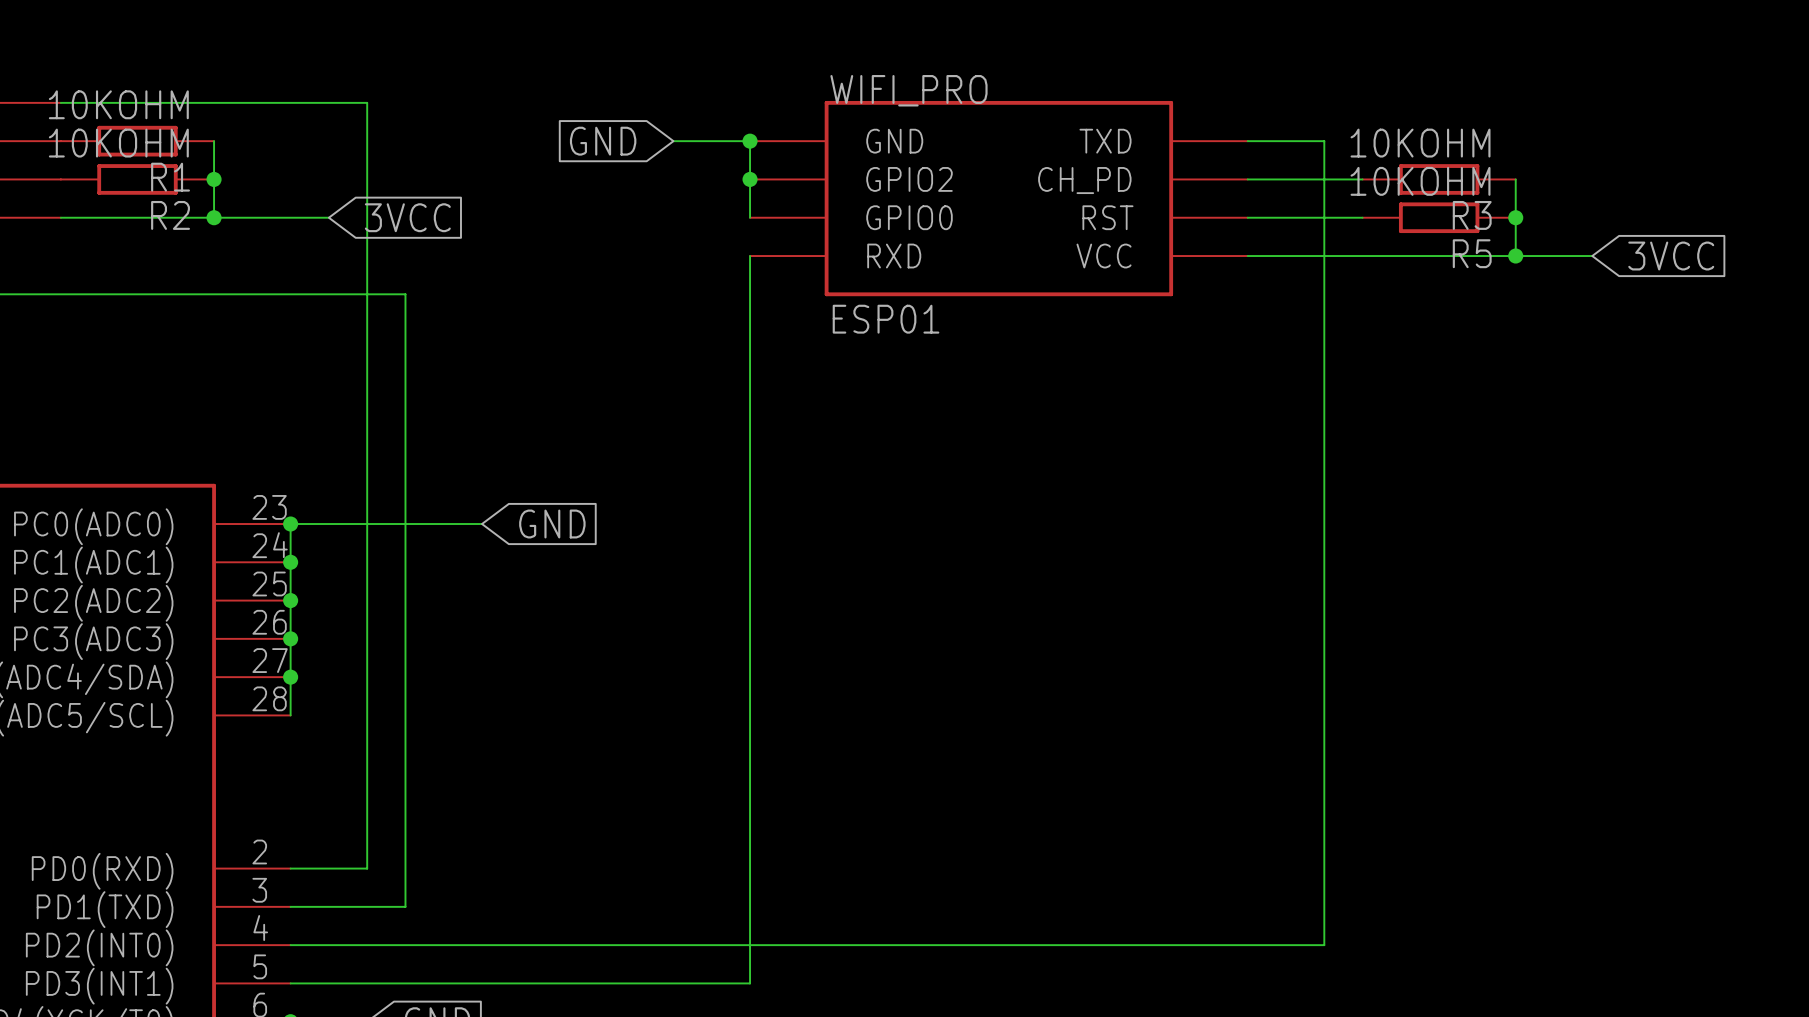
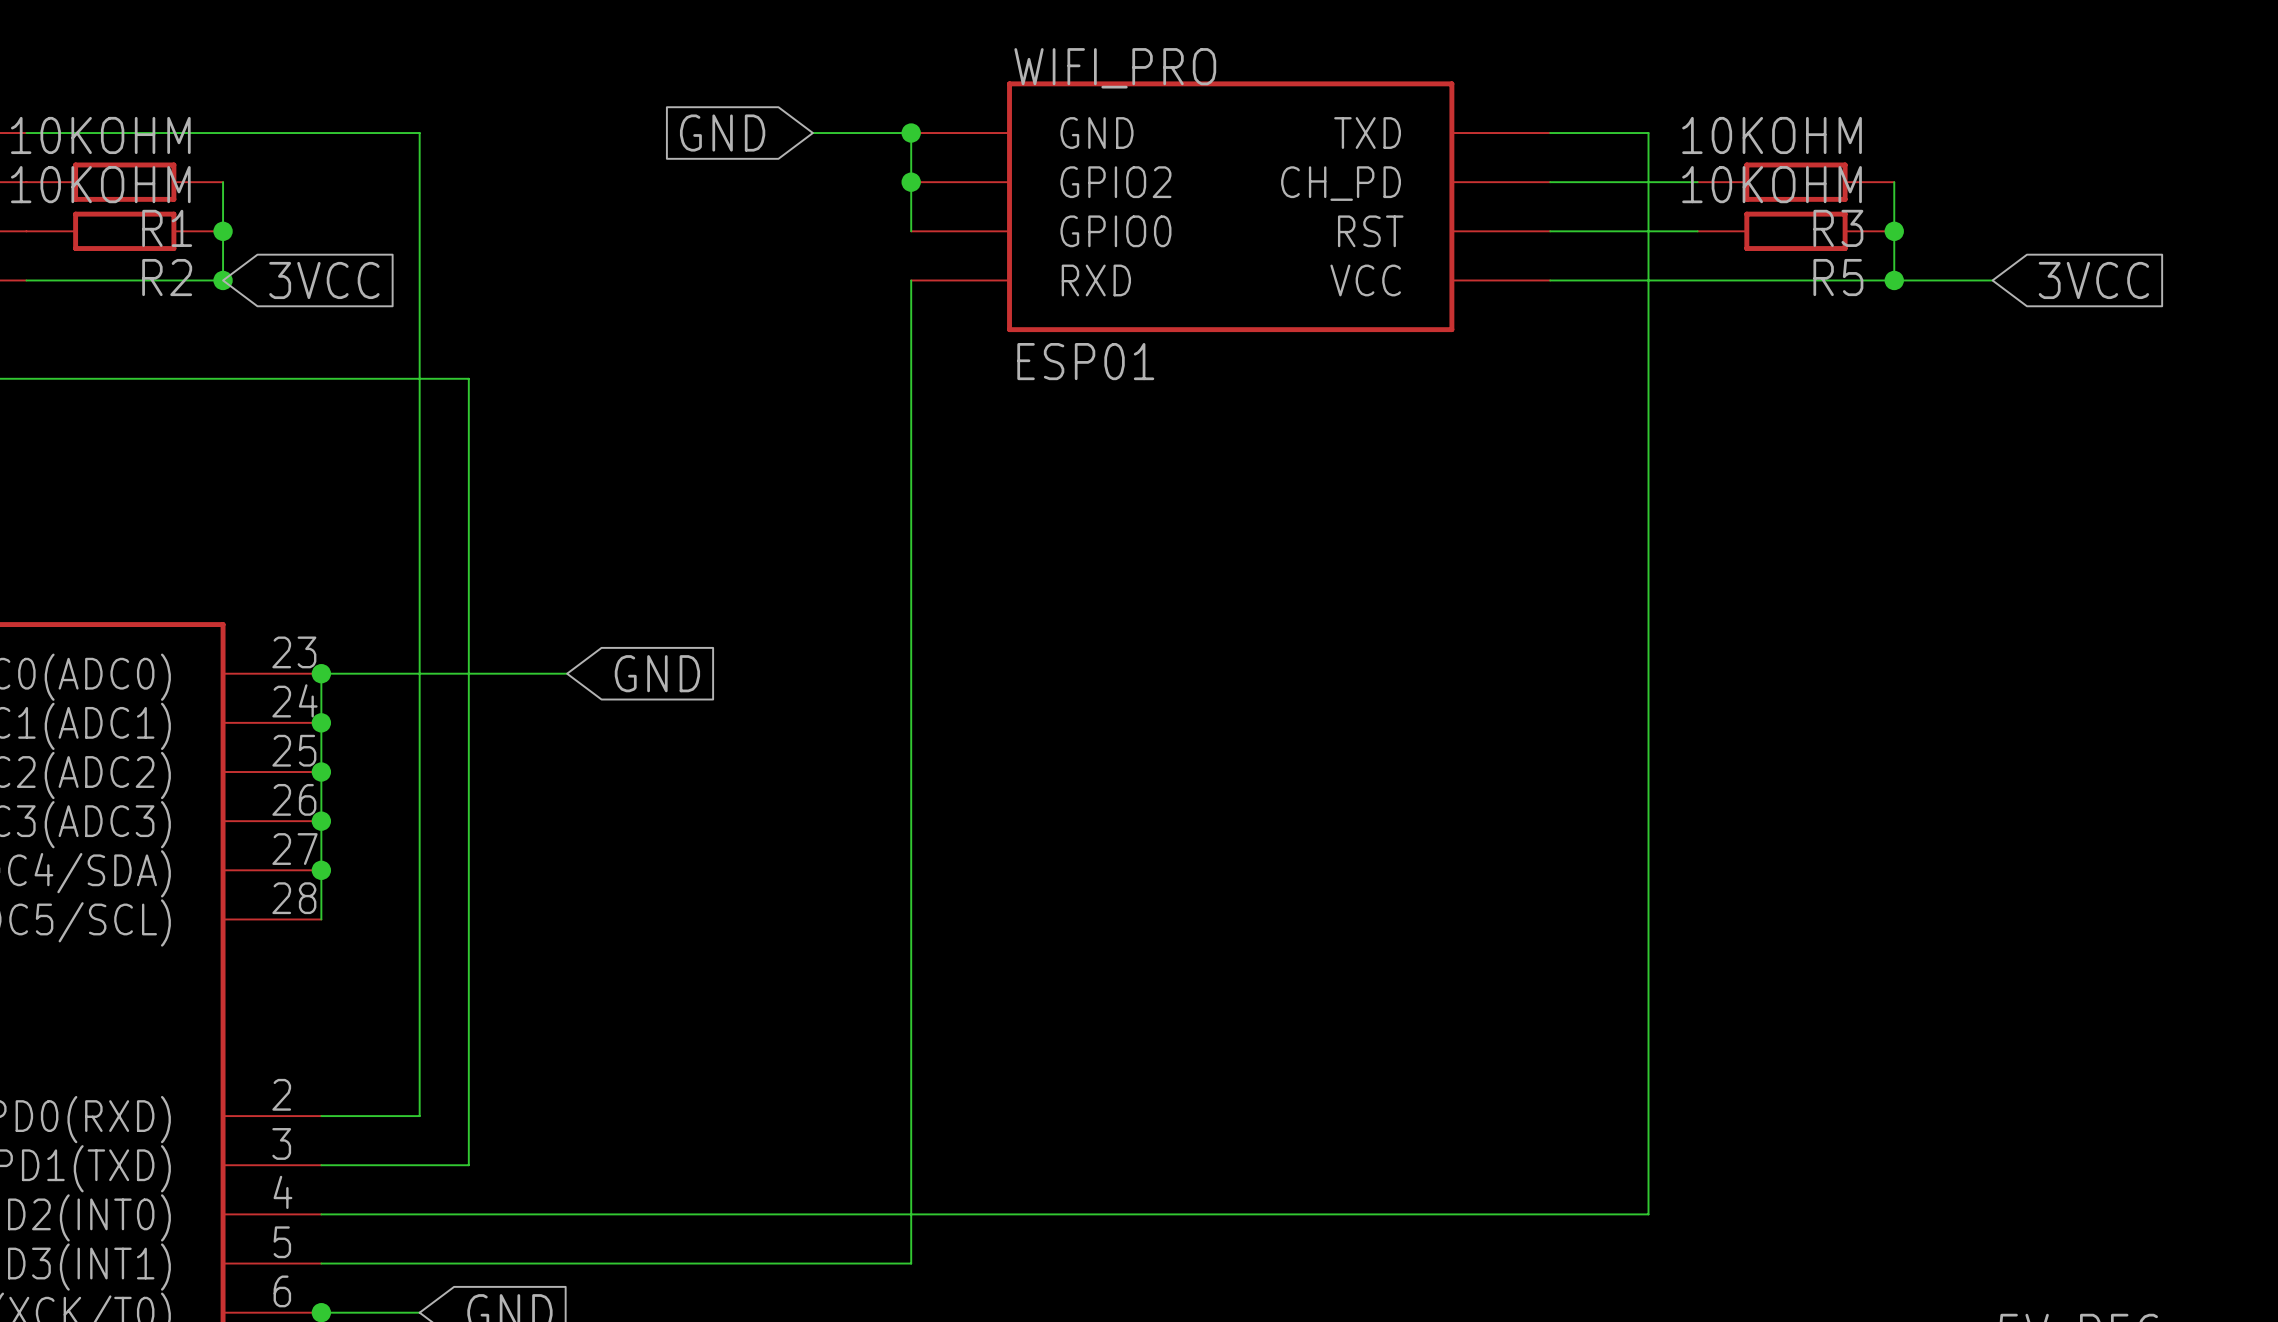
wire: none -> (1550, 133) (1648, 133) (1648, 182) (1697, 182)
global label position: GND (603, 141) -> GND (722, 133)
wire: (673, 141) (750, 141) -> (812, 133) (911, 133) (911, 182)
R3: none -> 10KOHM (1795, 182)
wire: (750, 179) (750, 217) -> (911, 329) (911, 280)
junction position: (750, 179) -> (911, 133)
WIFI_PRO position: (998, 198) -> (1230, 206)
R3 name: R3 (1472, 215) -> R5 (1838, 277)
wire: (214, 217) (328, 217) -> none
global label position: 3VCC (407, 217) -> 3VCC (324, 280)
wire: none -> (1697, 280) (1992, 280)
R5: 10KOHM (1439, 217) -> none
wire: (1515, 217) (1515, 256) -> (1894, 182) (1894, 231)
wire: (1247, 256) (1592, 256) -> none
junction position: (1515, 256) -> (1894, 231)
global label position: 3VCC (1671, 256) -> 3VCC (2093, 280)

